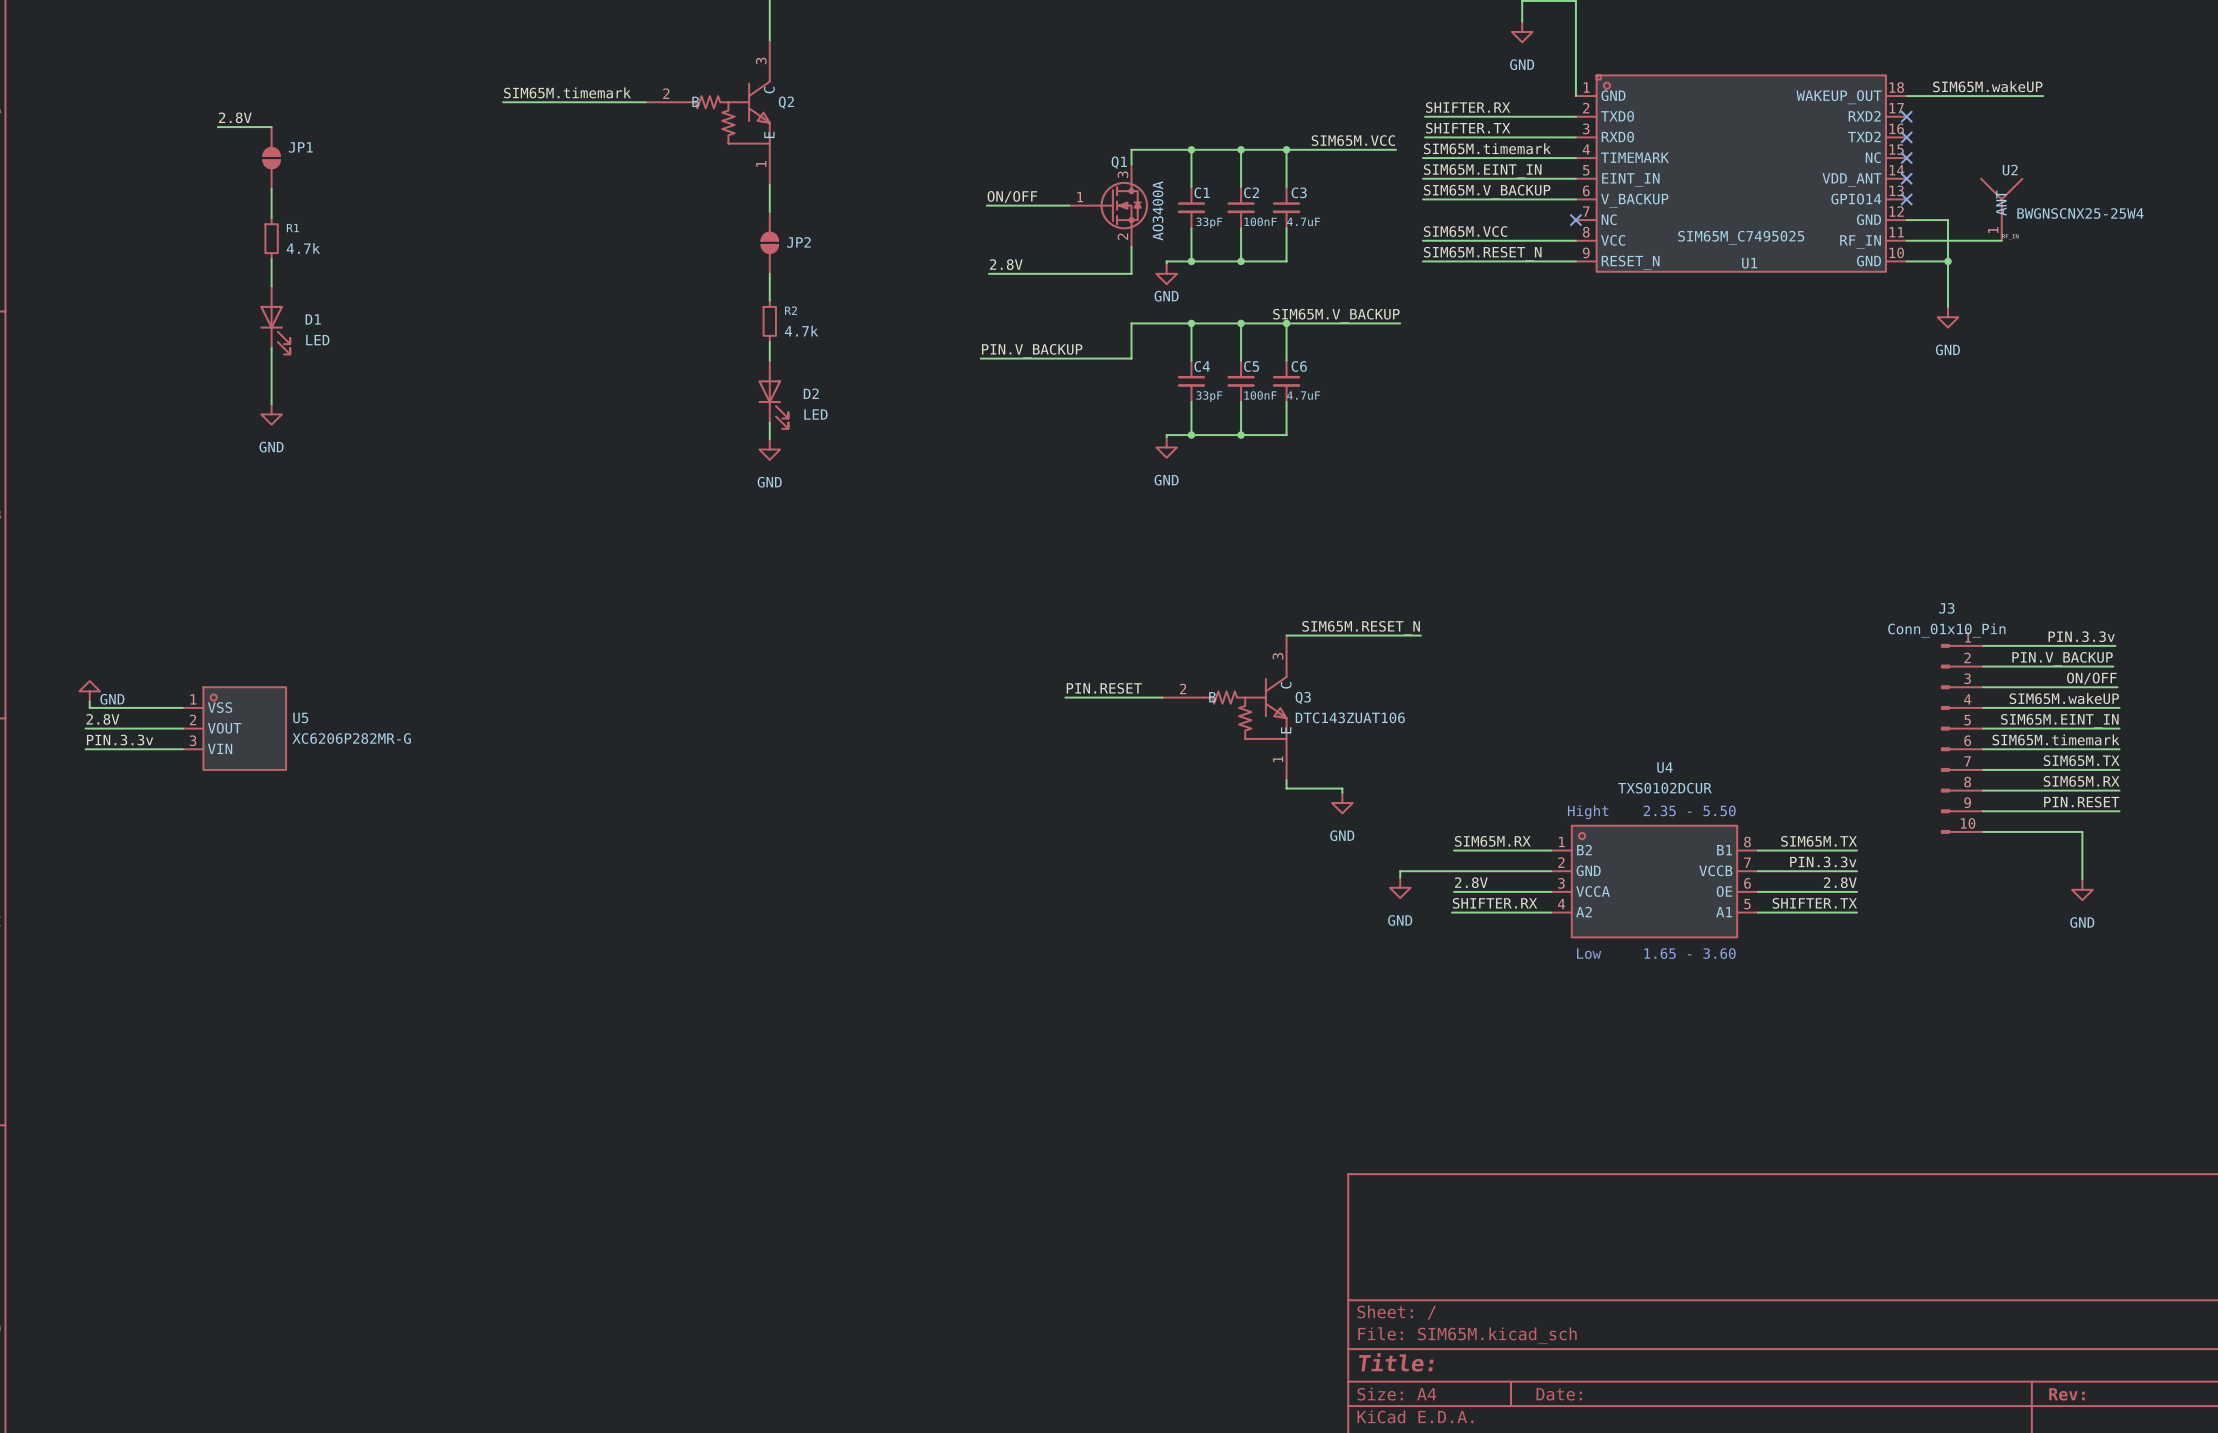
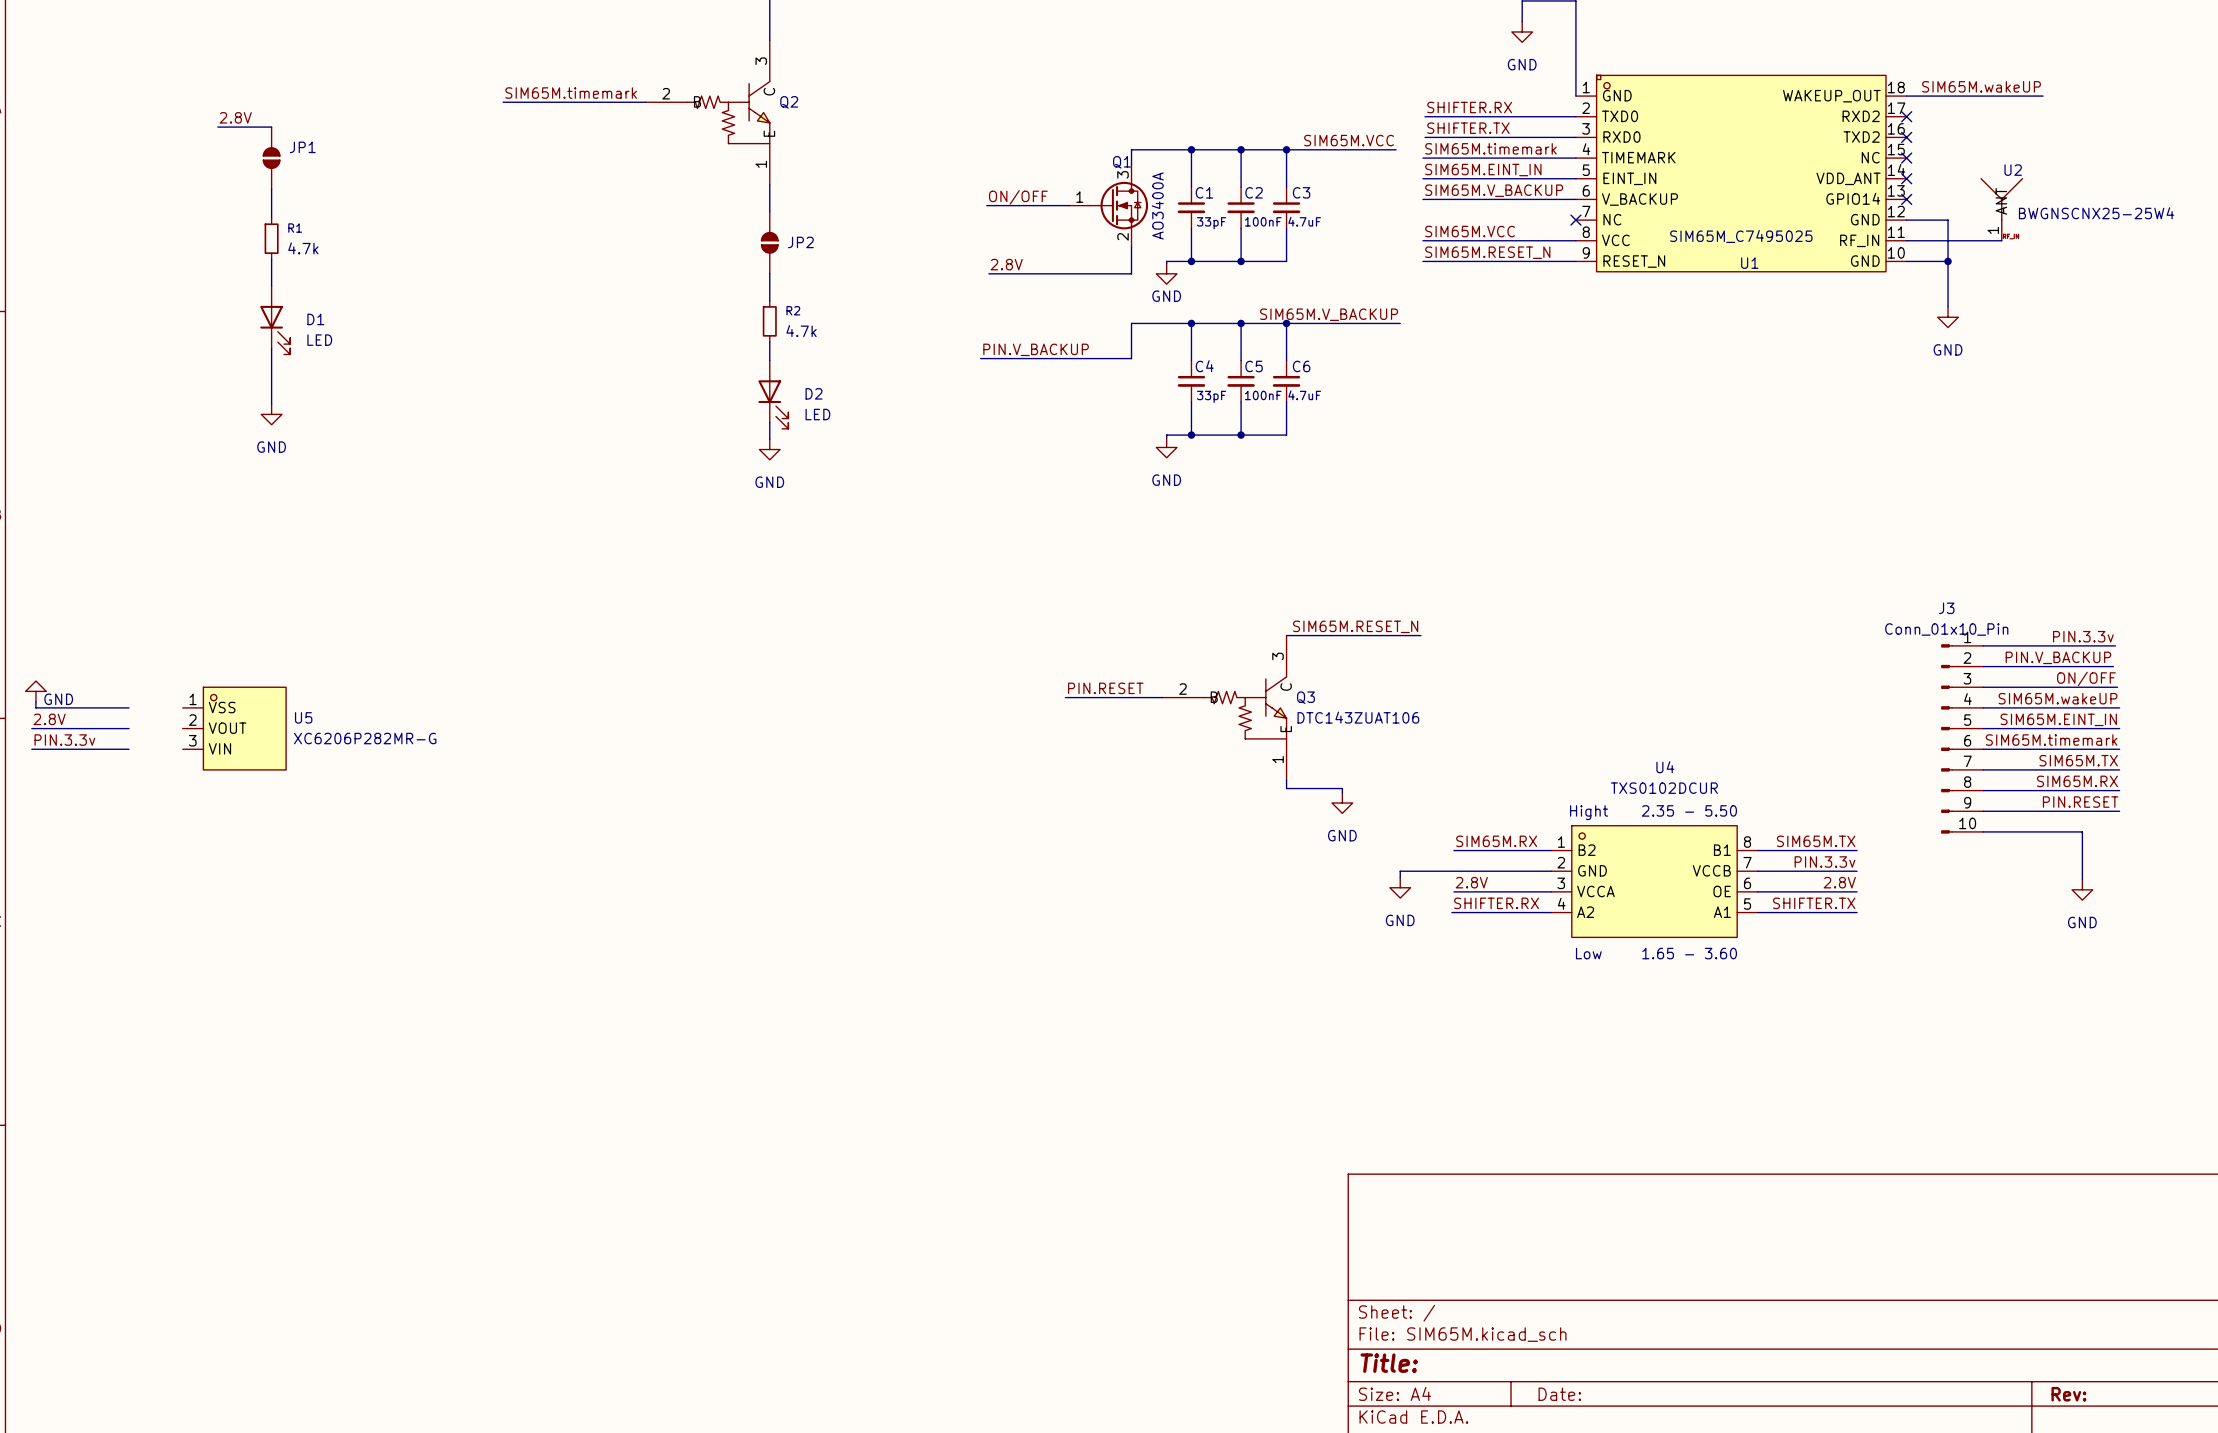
power symbol position: GND (89, 691) -> GND (35, 691)
wire: (89, 701) (89, 707) -> (35, 701) (35, 707) (89, 707)
wire: (128, 707) (182, 707) -> none
label position: 2.8V (102, 719) -> 2.8V (49, 719)
wire: (128, 728) (182, 728) -> (31, 728) (85, 728)
label position: PIN.3.3v (120, 740) -> PIN.3.3v (64, 740)
wire: (128, 749) (182, 749) -> (31, 749) (85, 749)

